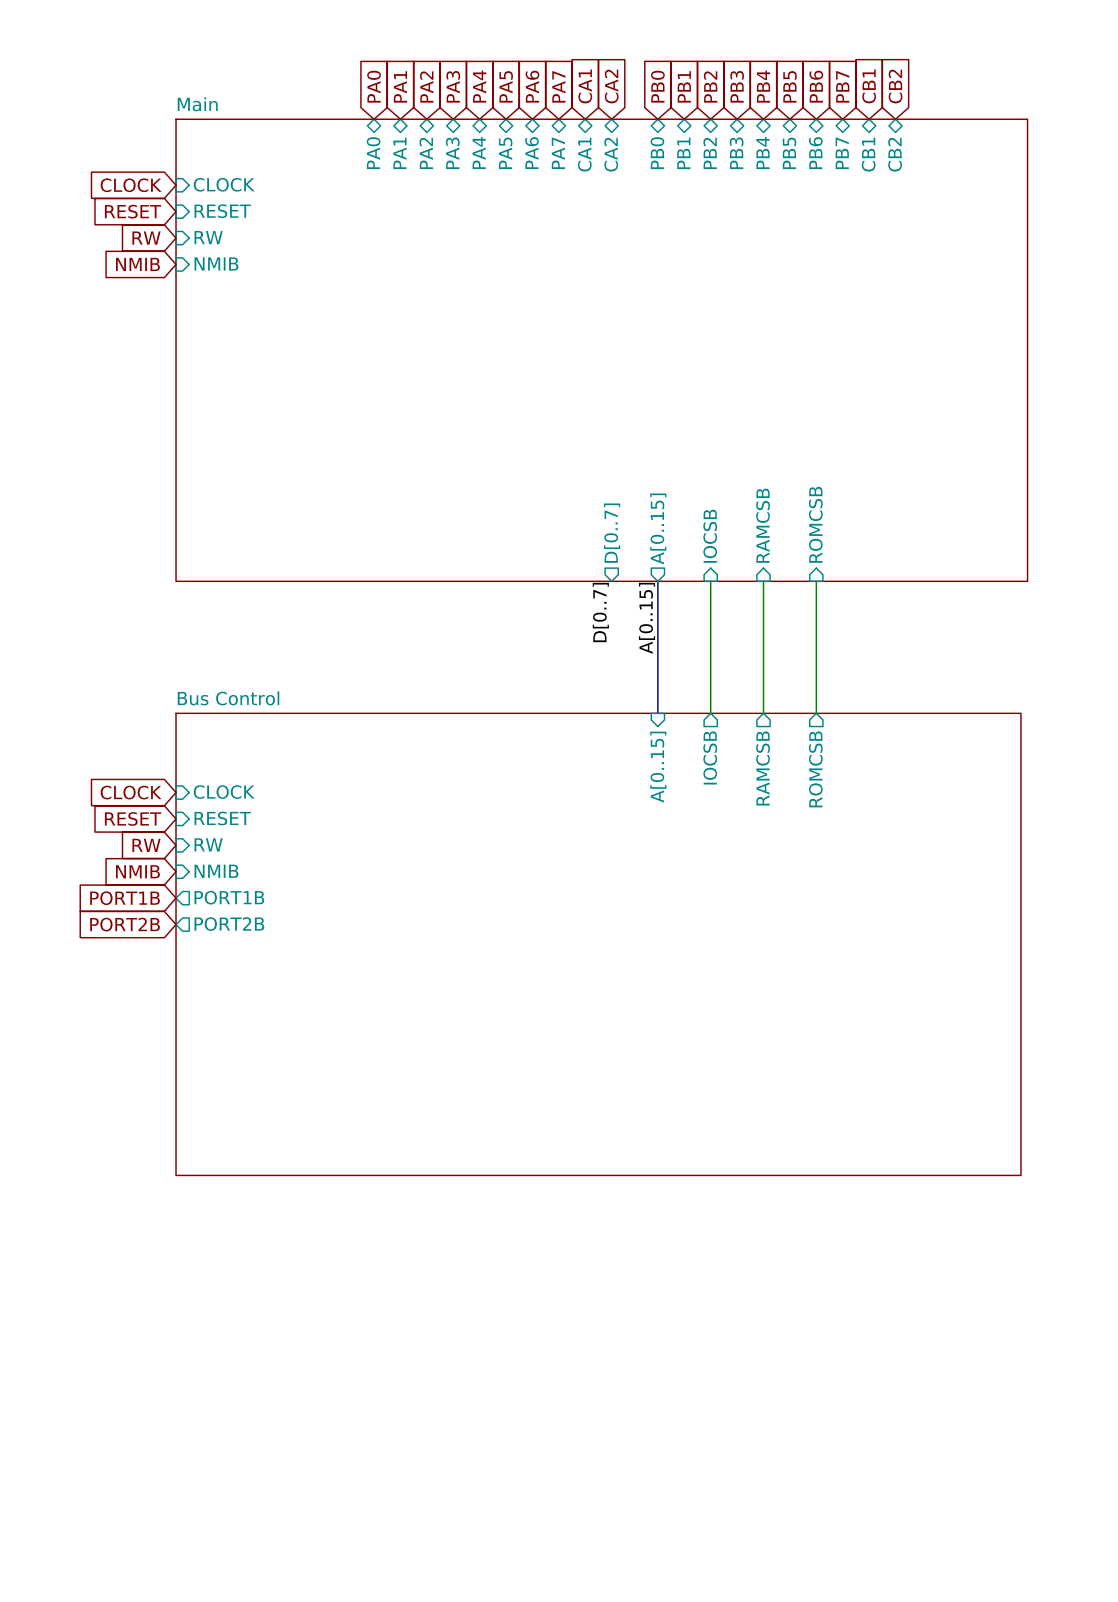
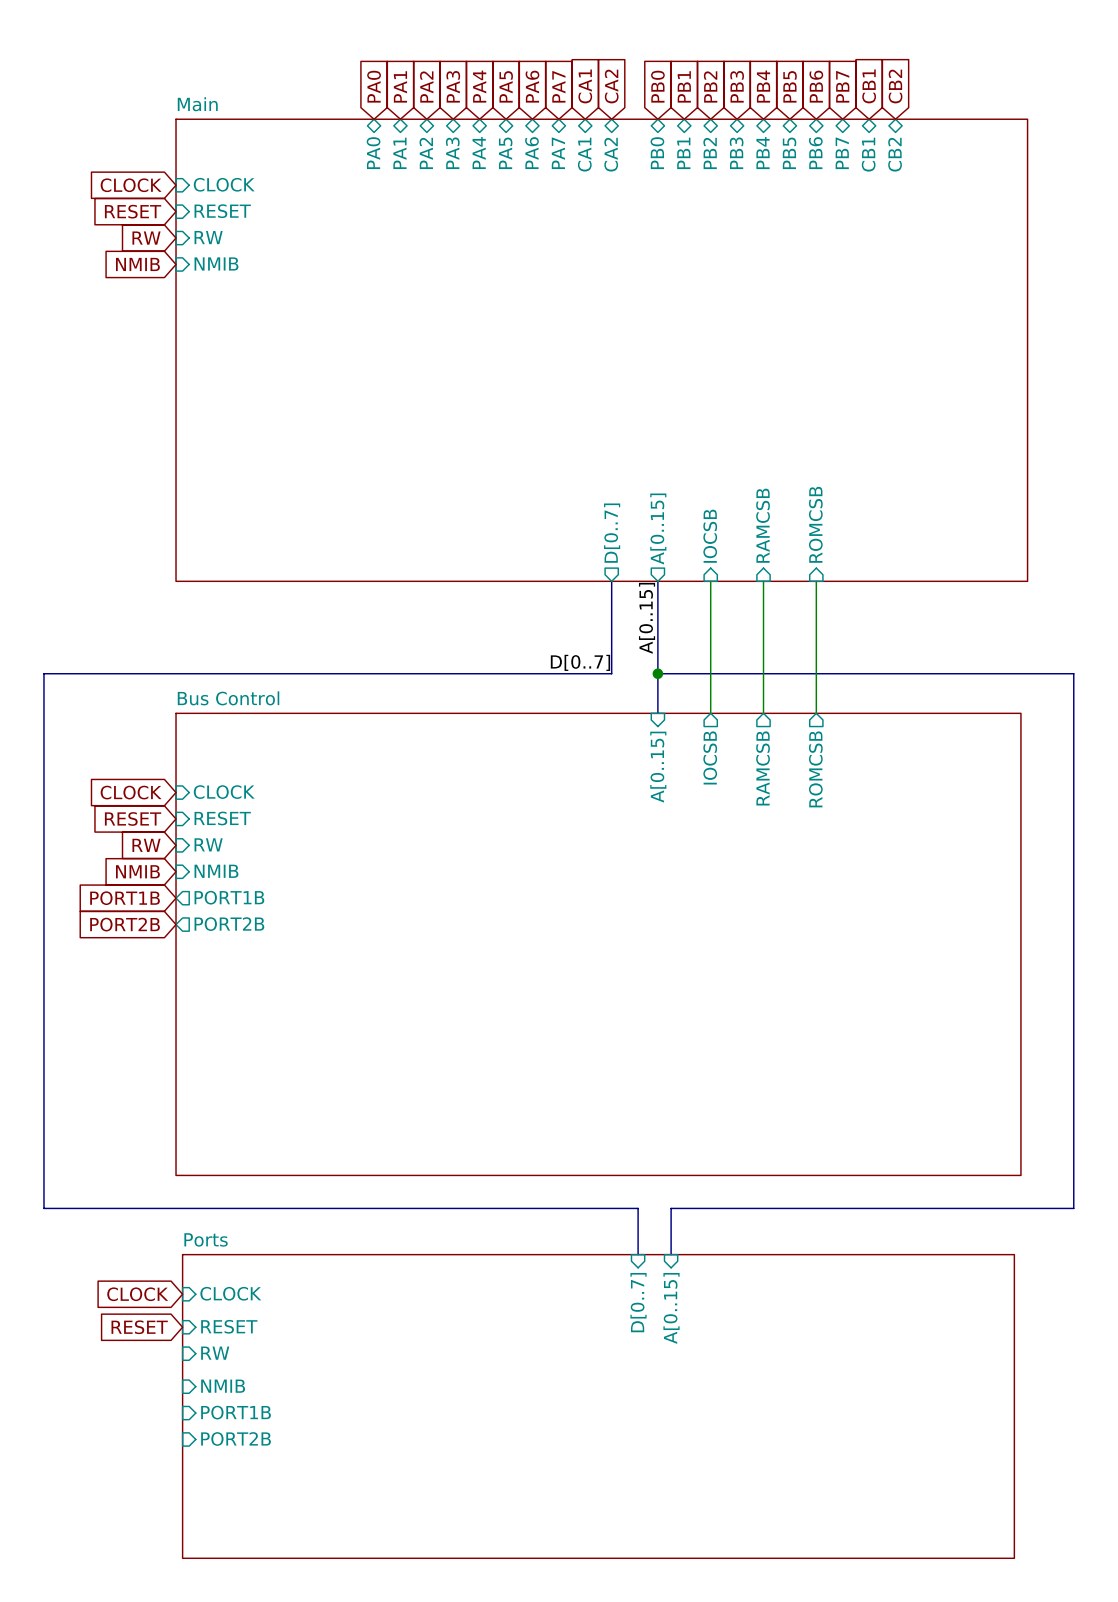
bus: none -> (611, 581) (611, 673) (43, 673) (43, 1208) (638, 1208) (638, 1254)
label rotation: 0° (600, 612) -> 90° clockwise (580, 662)
bus: none -> (657, 673) (1073, 673) (1073, 1208) (671, 1208) (671, 1254)
junction: none -> (657, 673)
sheet pin: none -> CLOCK (230, 1293)
global label: none -> CLOCK (137, 1294)
sheet pin: none -> D[0..7] (638, 1302)
sheet pin: none -> A[0..15] (671, 1308)
sheet pin: none -> RESET (229, 1326)
global label: none -> RESET (139, 1327)
sheet pin: none -> RW (215, 1353)
sheet pin: none -> NMIB (223, 1386)
sheet Ports: none -> (598, 1406)
sheet pin: none -> PORT1B (236, 1412)
sheet pin: none -> PORT2B (236, 1438)

